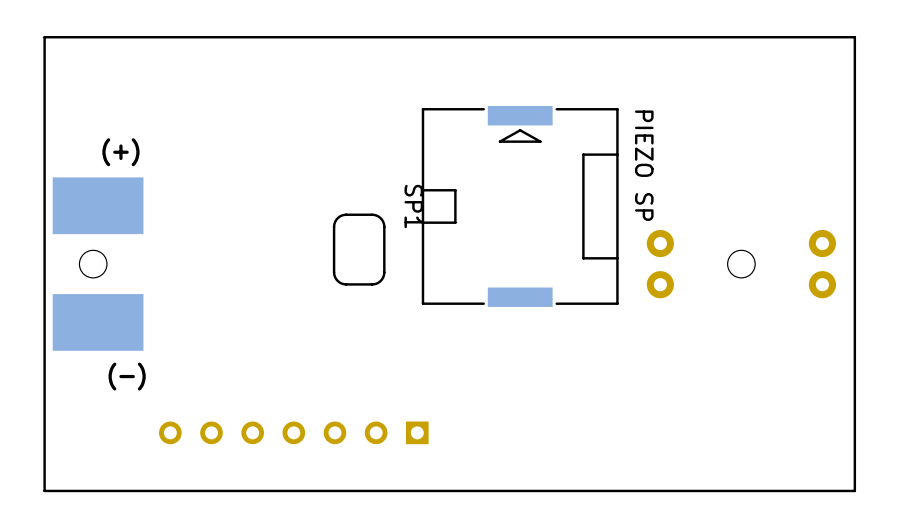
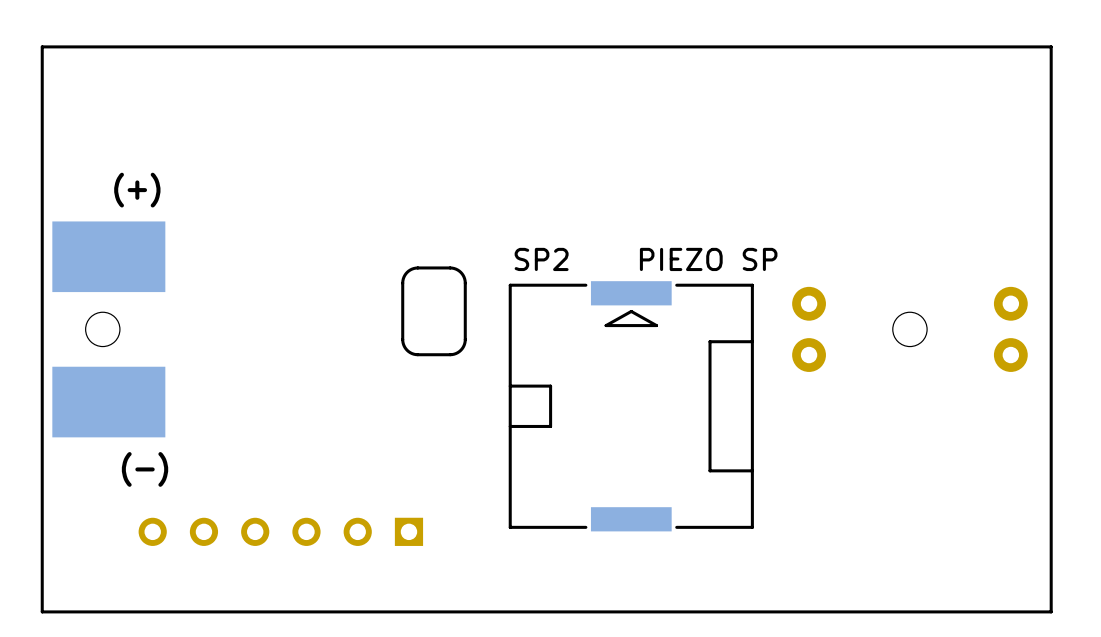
SP1: PIEZO SP (520, 206) -> none
SP2: none -> PIEZO SP (631, 406)
part: none -> (280, 531)
part: (293, 432) -> none

